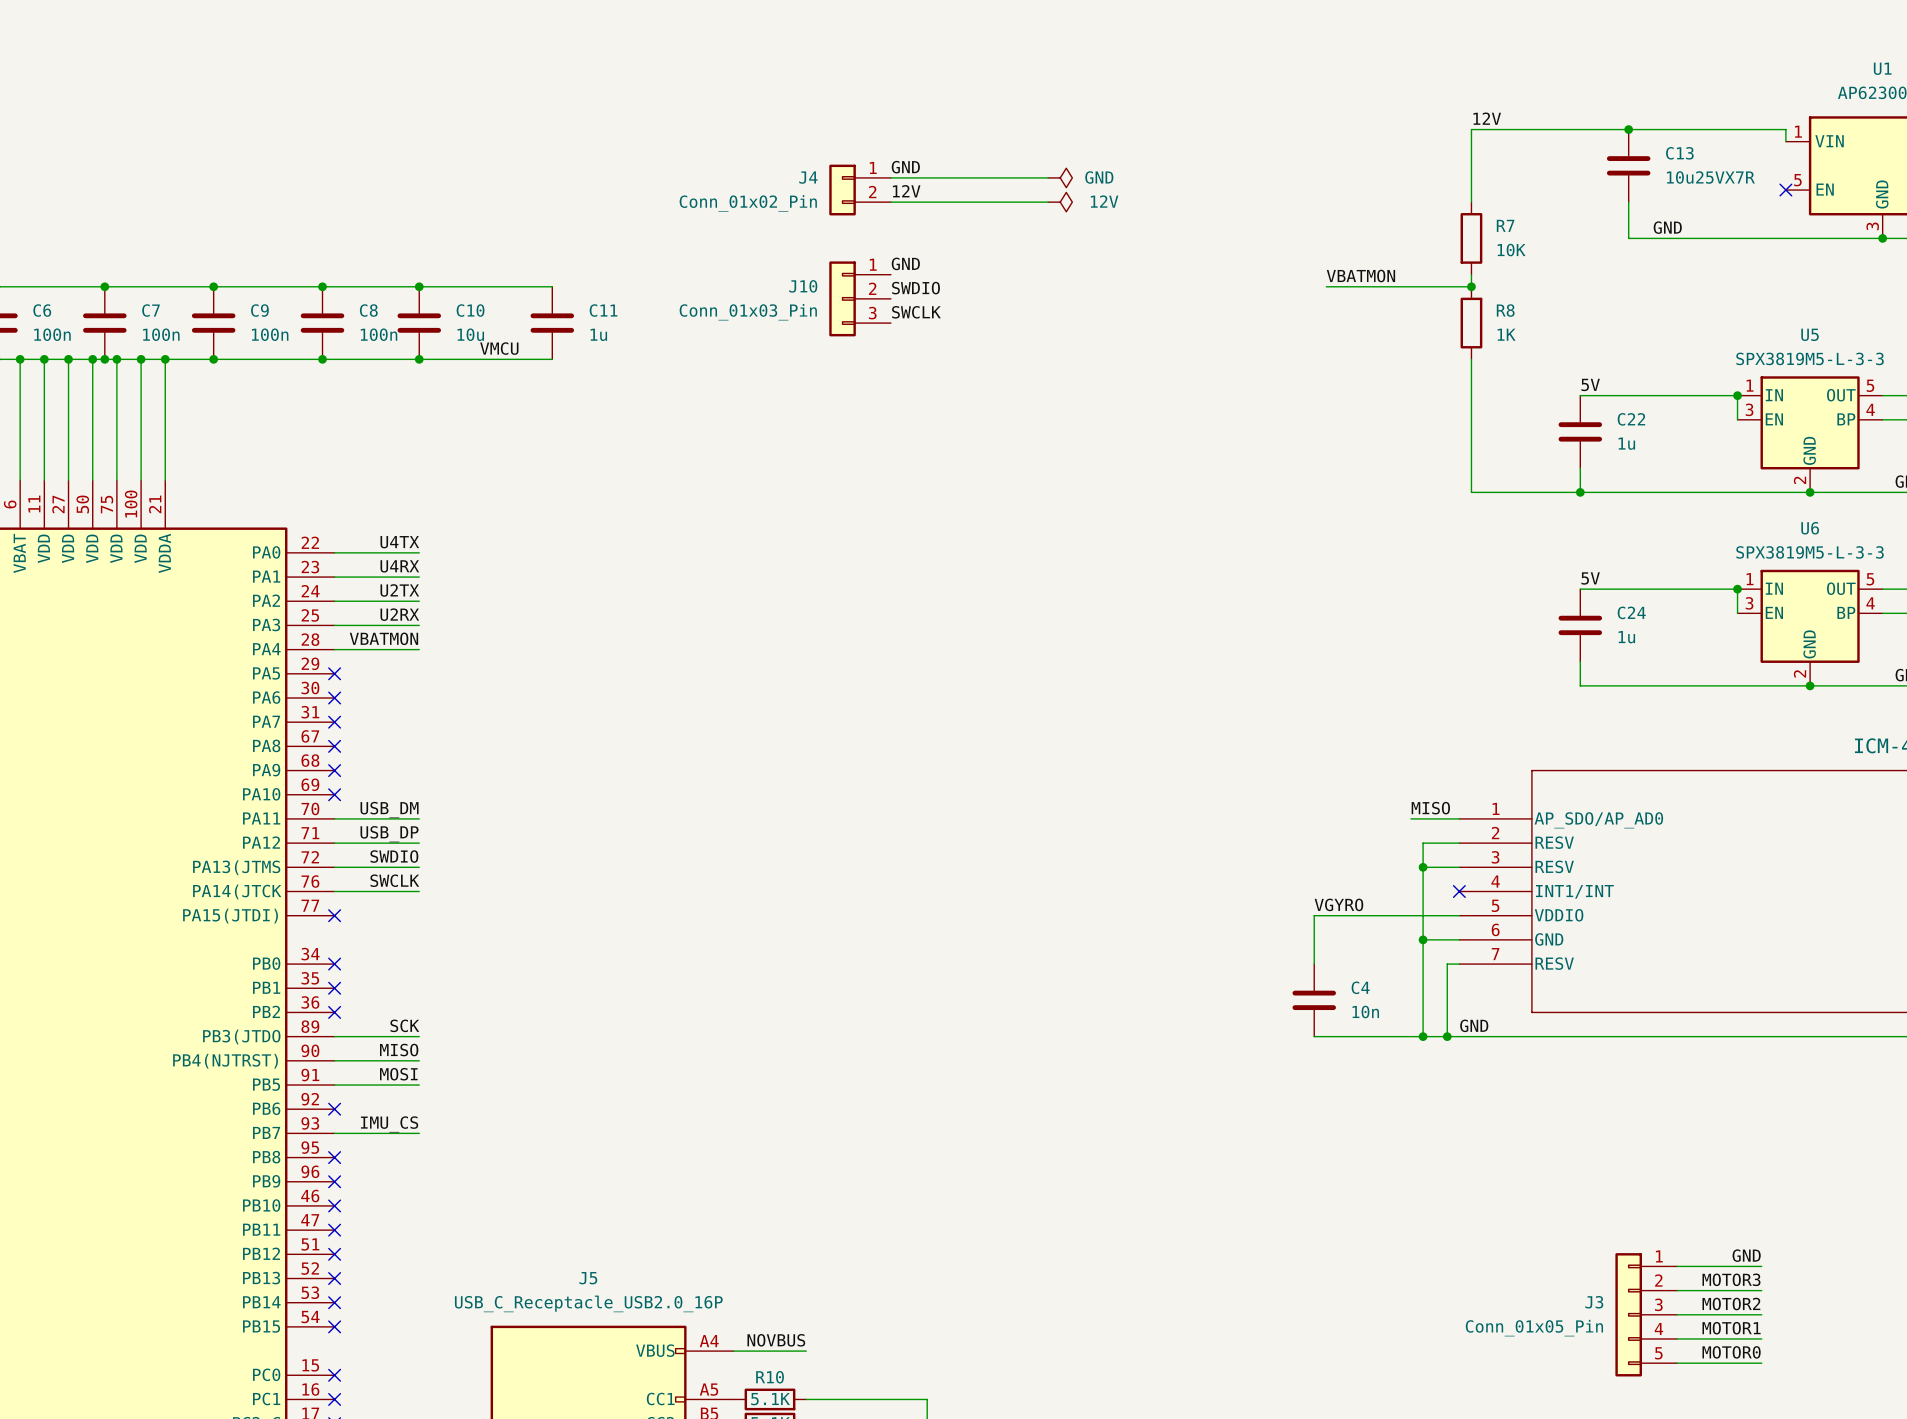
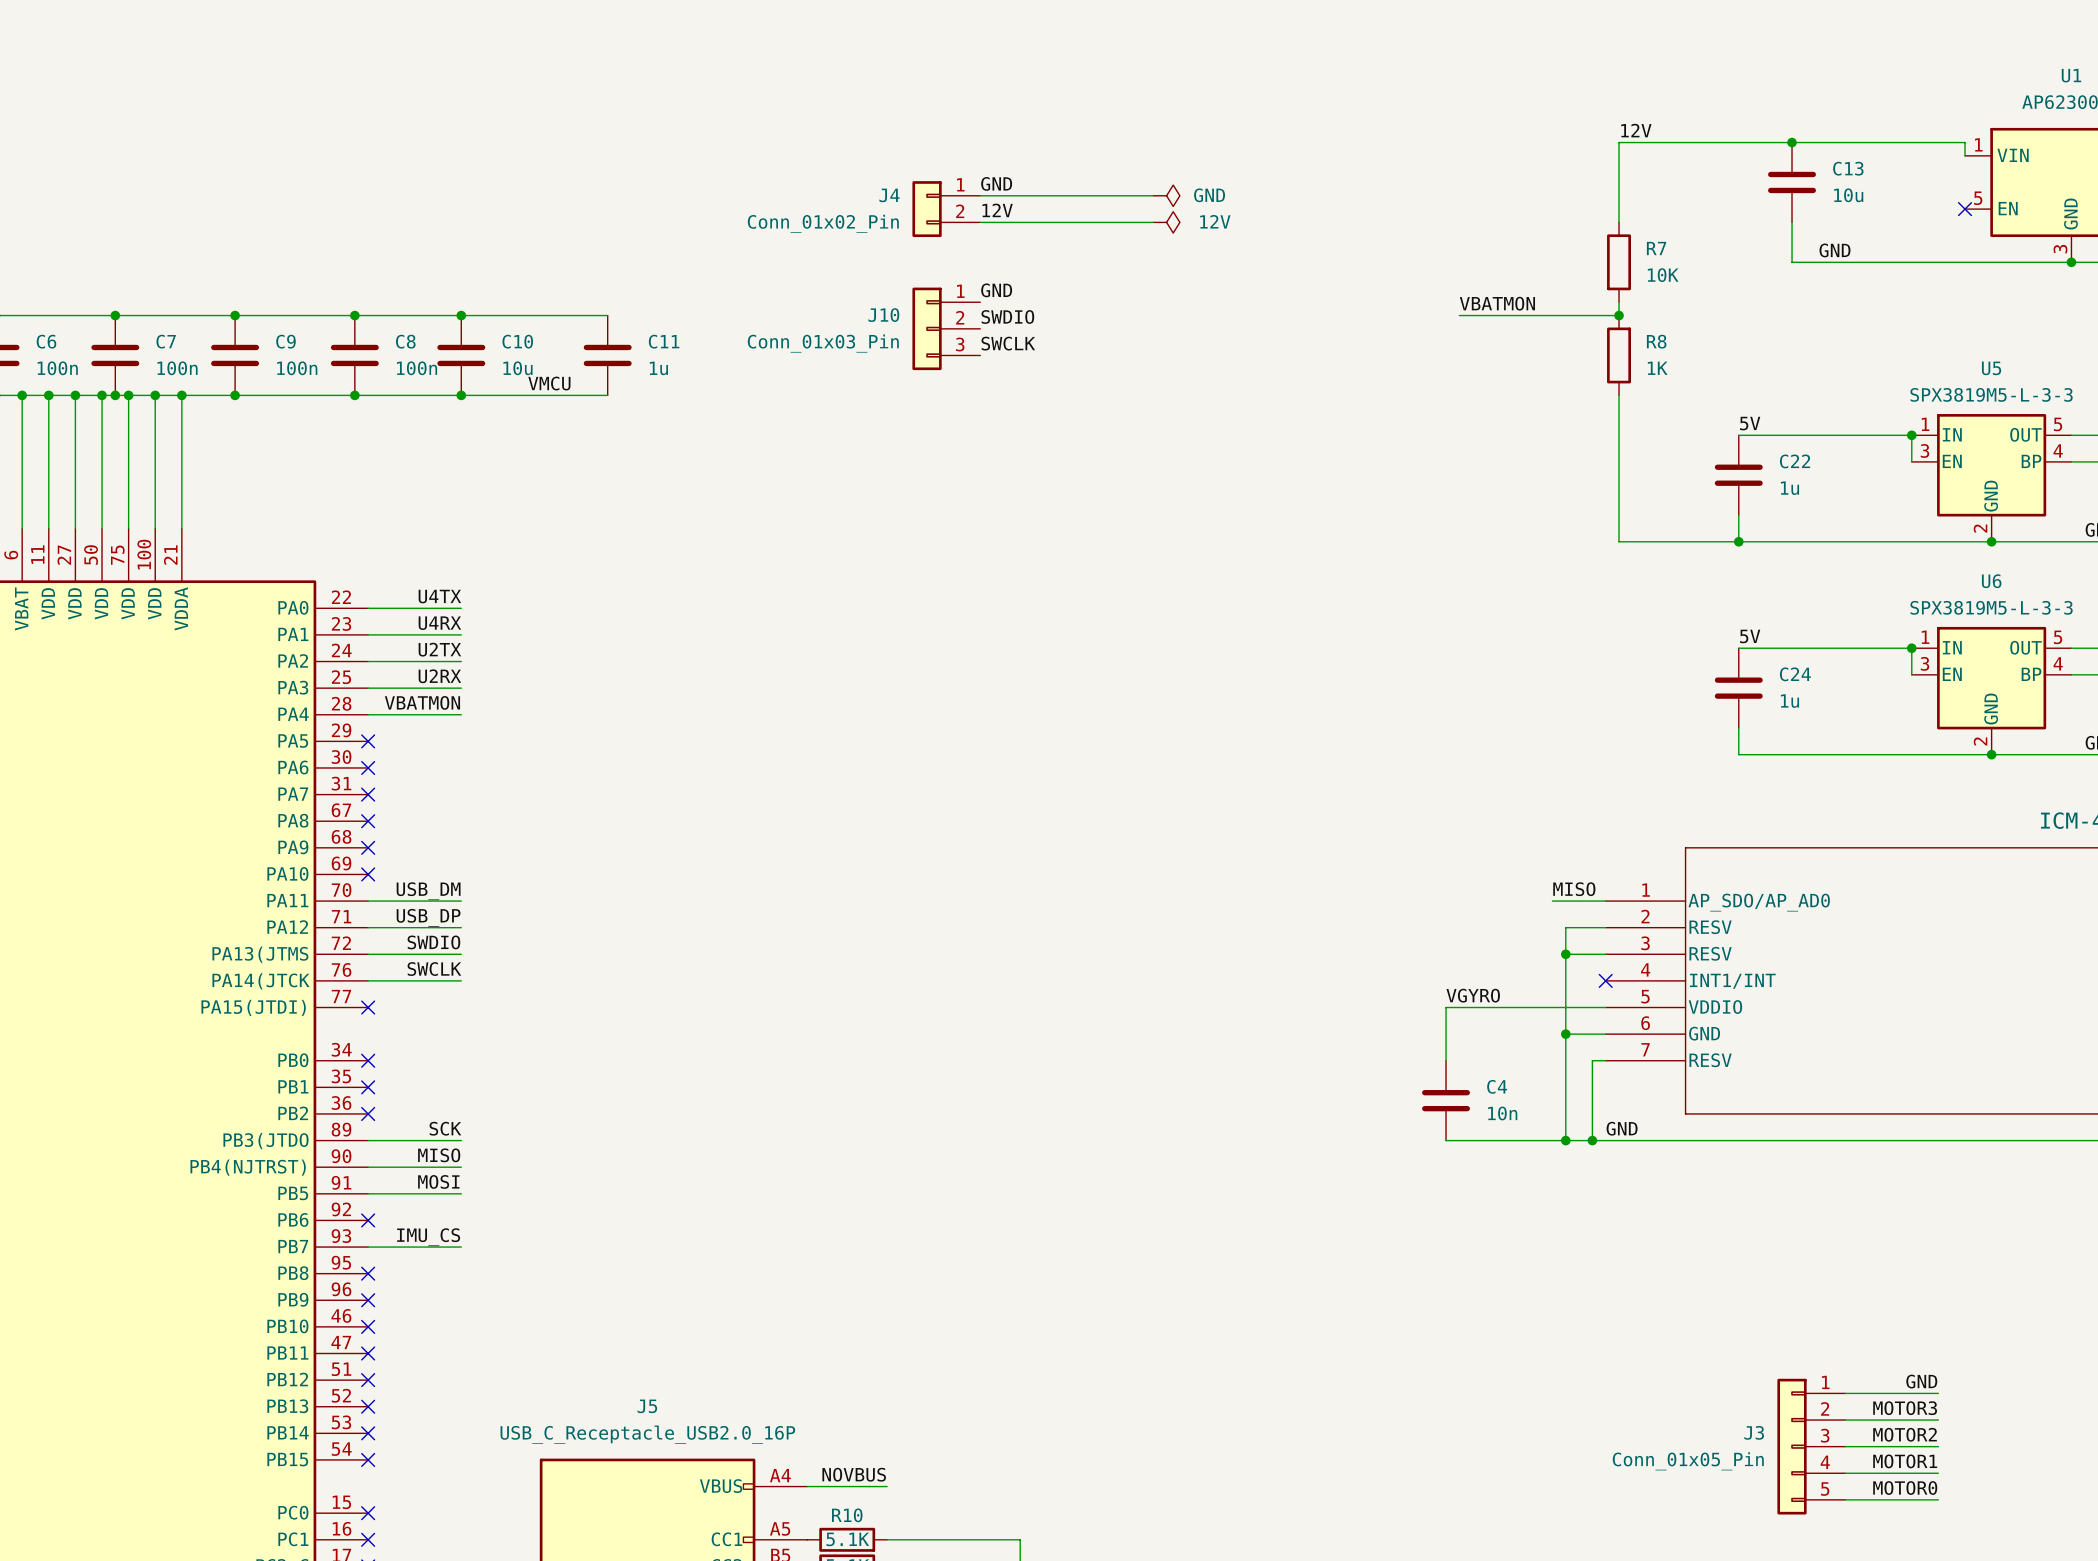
C13 value: 10u25VX7R (1710, 177) -> 10u (1848, 195)

